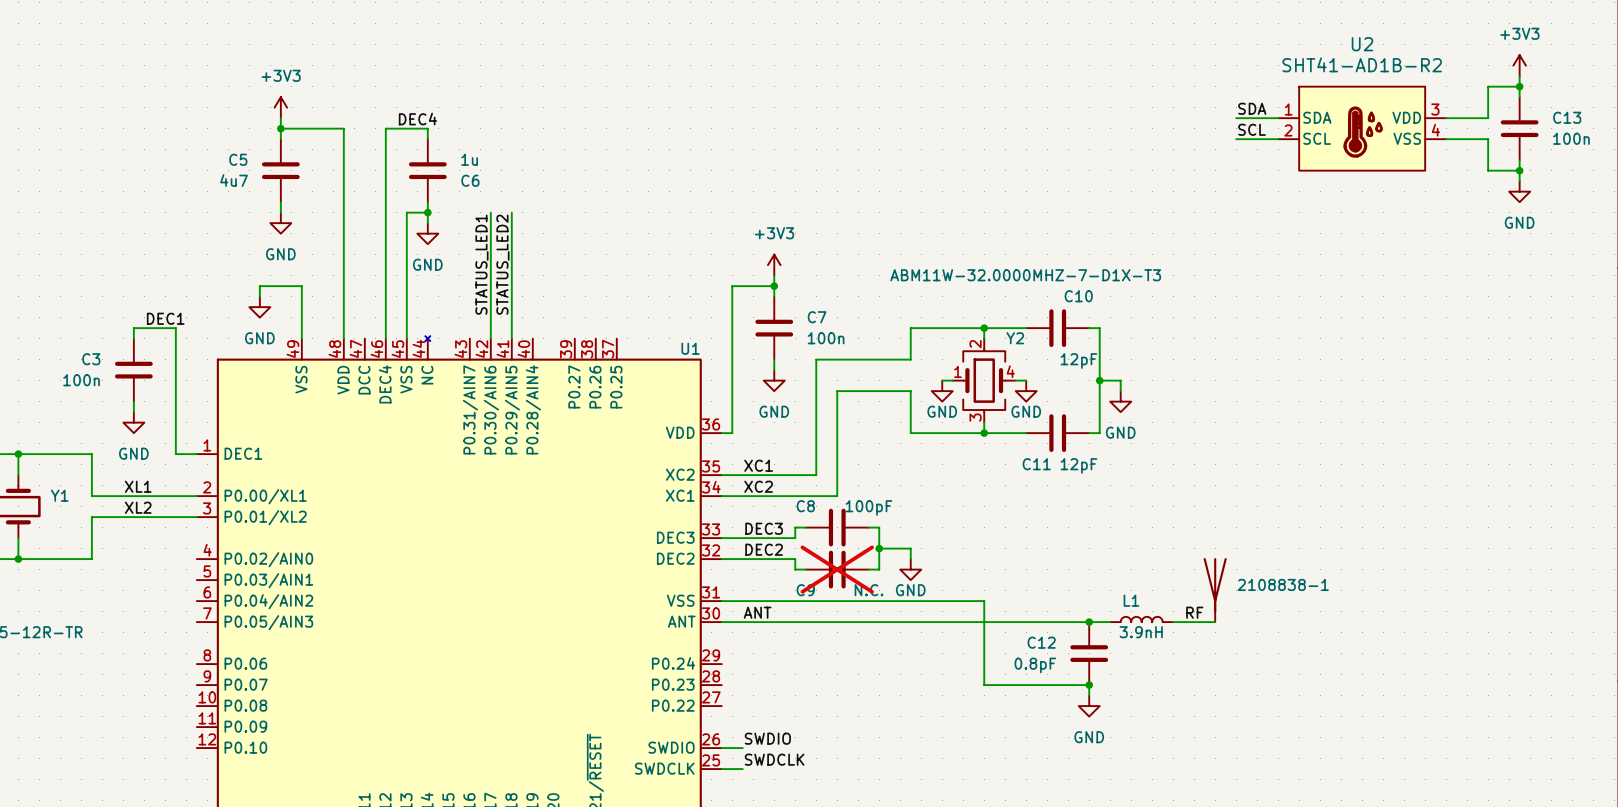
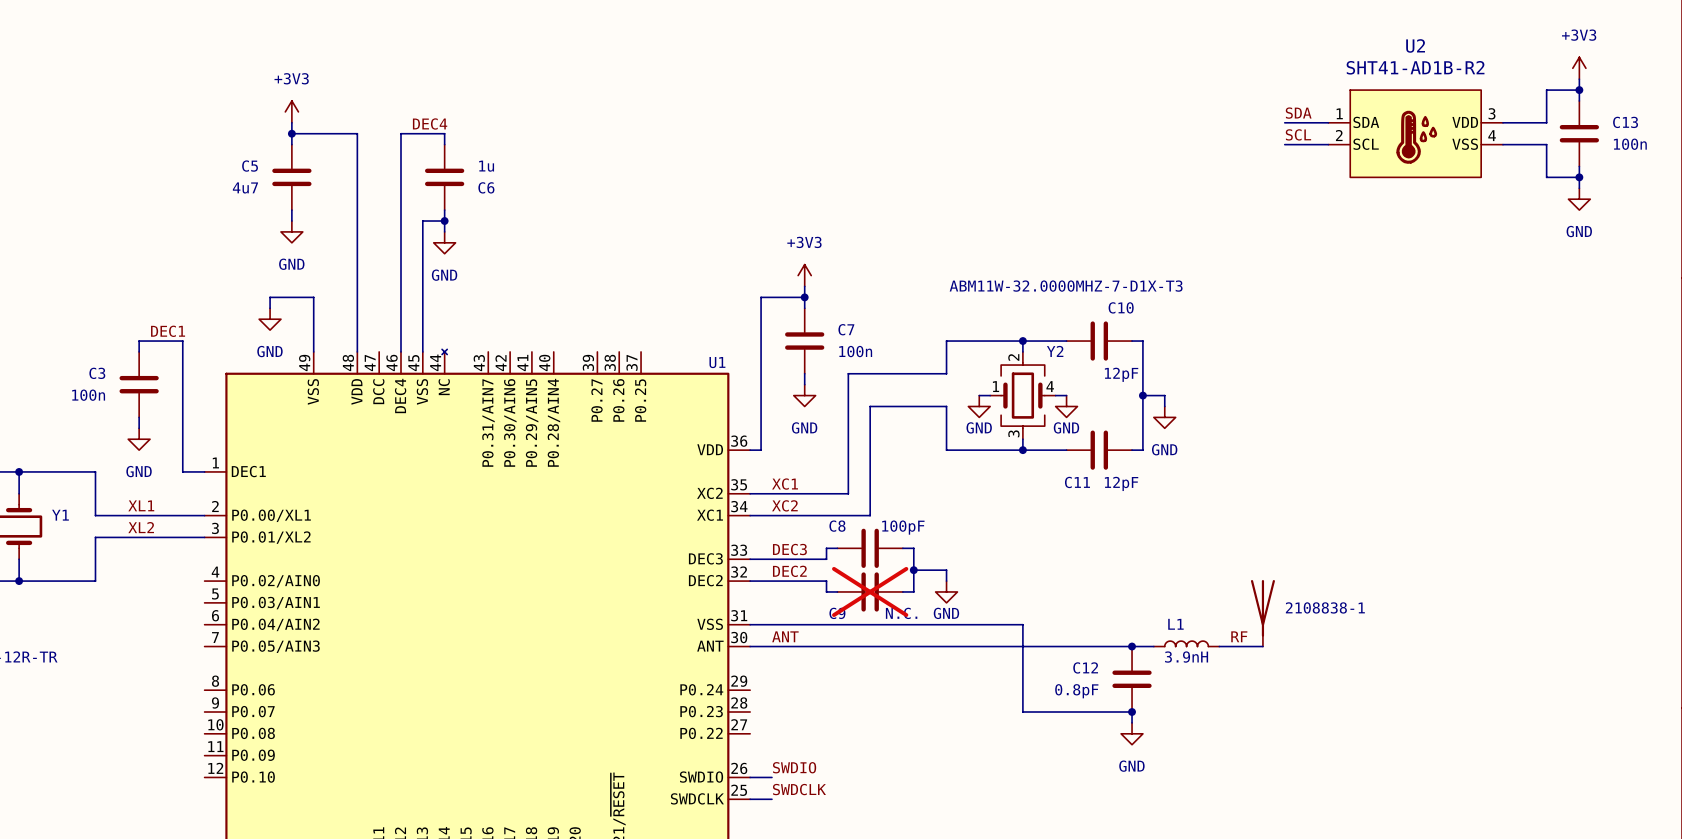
wire: (490, 212) (490, 338) -> none
wire: (511, 212) (511, 338) -> none
label: STATUS_LED1 (481, 264) -> none
label: STATUS_LED2 (502, 264) -> none

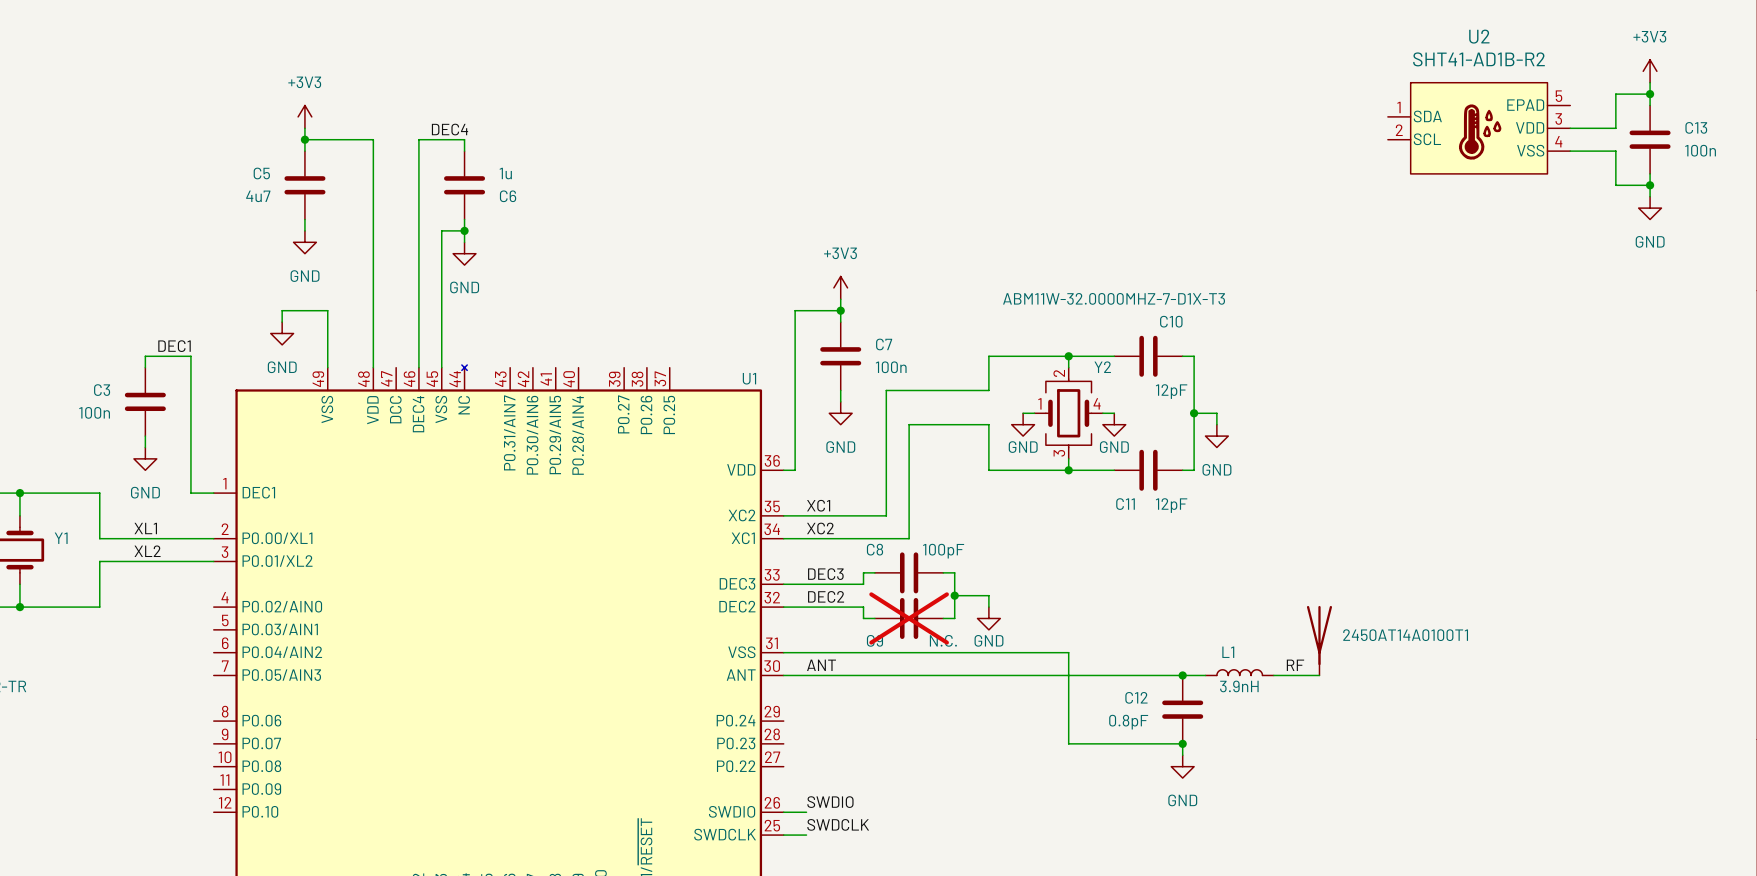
U2 symbol: [1328, 90, 1503, 178] -> [1387, 82, 1571, 174]
label: SDA (1298, 113) -> none
wire: (1284, 122) (1328, 122) -> none
label: SCL (1298, 134) -> none
wire: (1284, 144) (1328, 144) -> none
2108838-1 name: 2108838-1 (1325, 607) -> 2450AT14A0100T1 (1405, 635)

